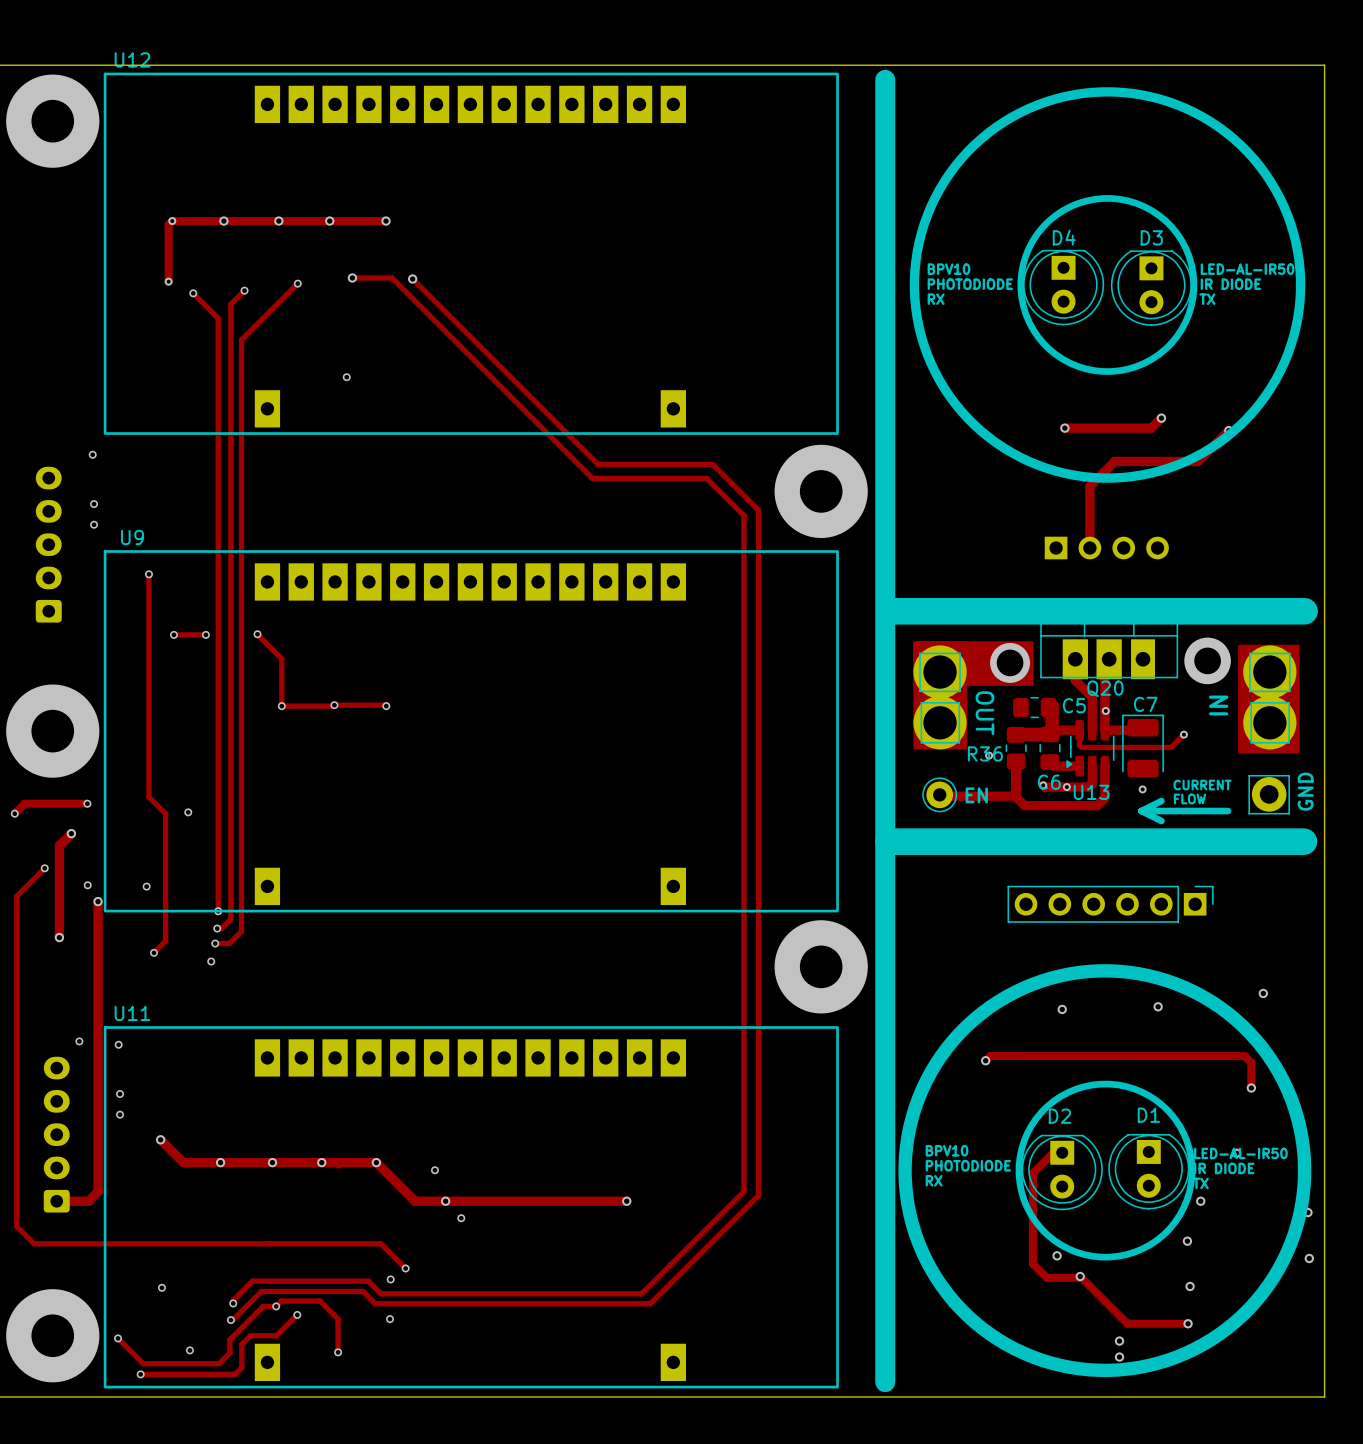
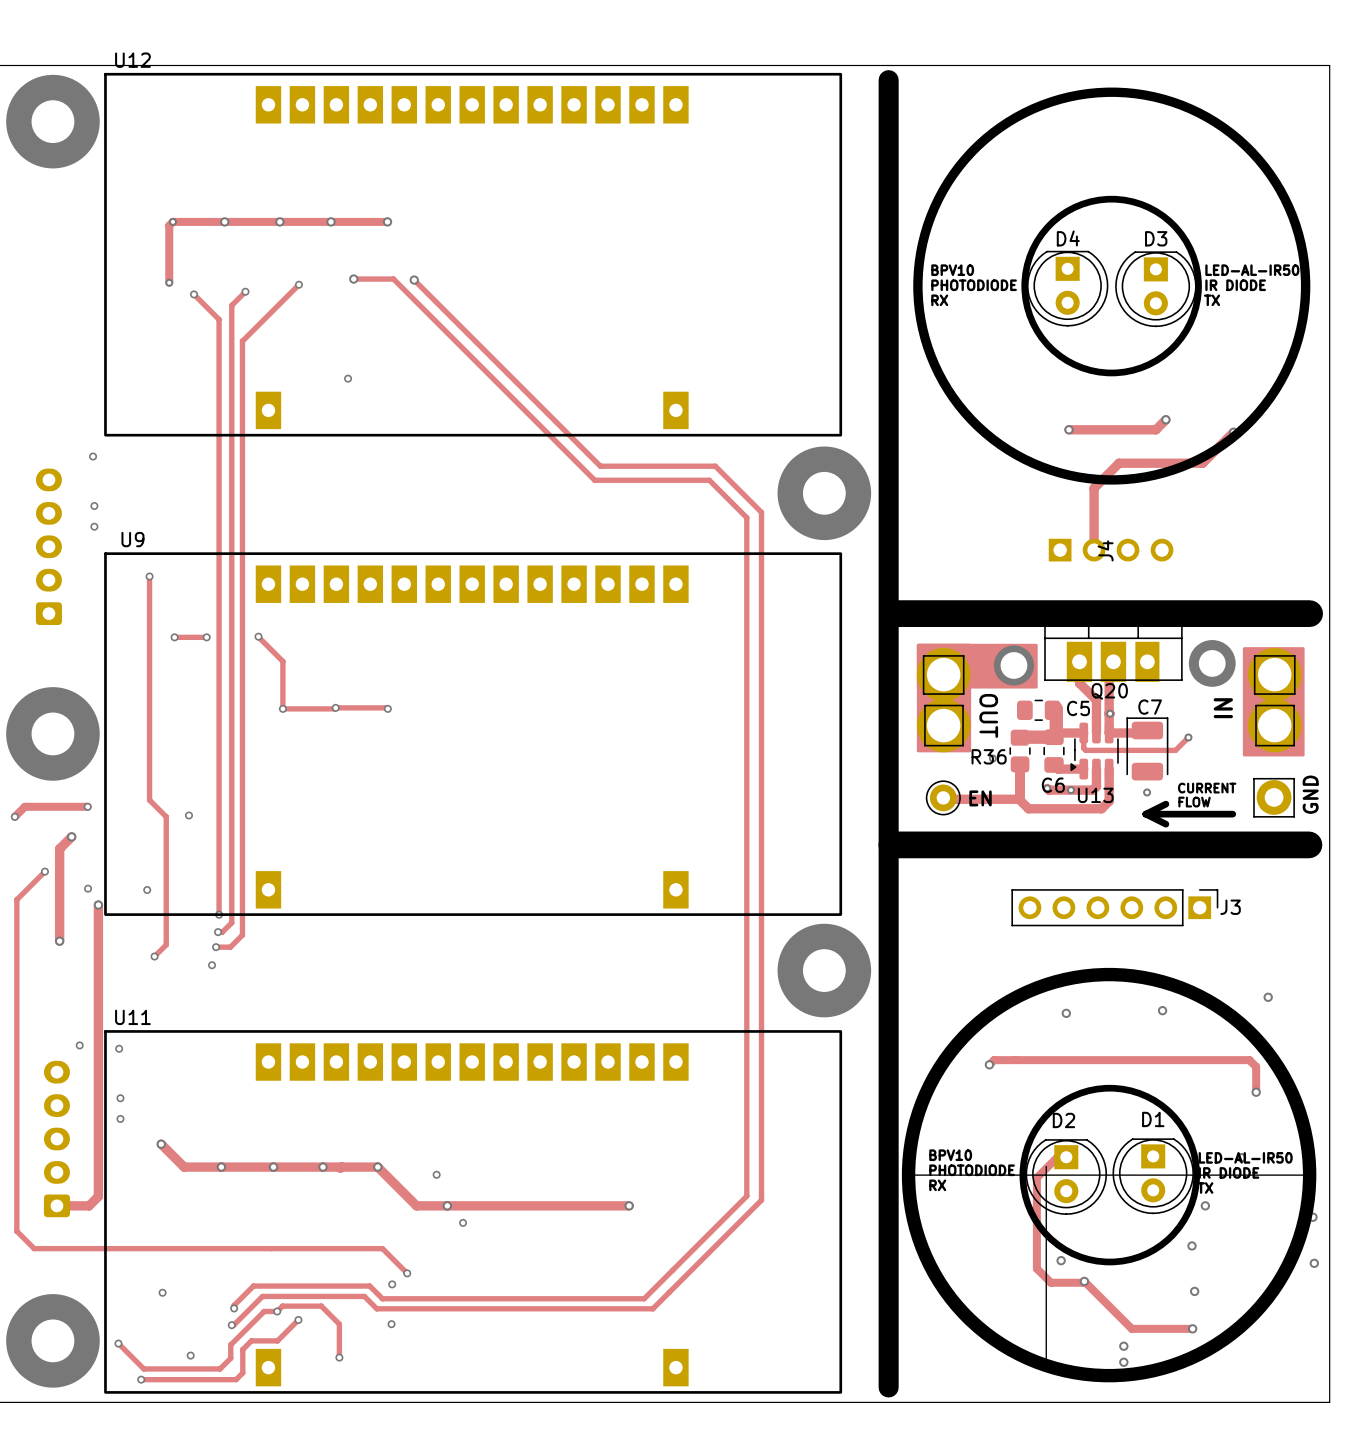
J4 name: none -> J4 (1105, 550)
J3 name: none -> J3 (1230, 907)
line: none -> (1046, 1166) (1046, 1367)
line: none -> (908, 1175) (1309, 1175)

